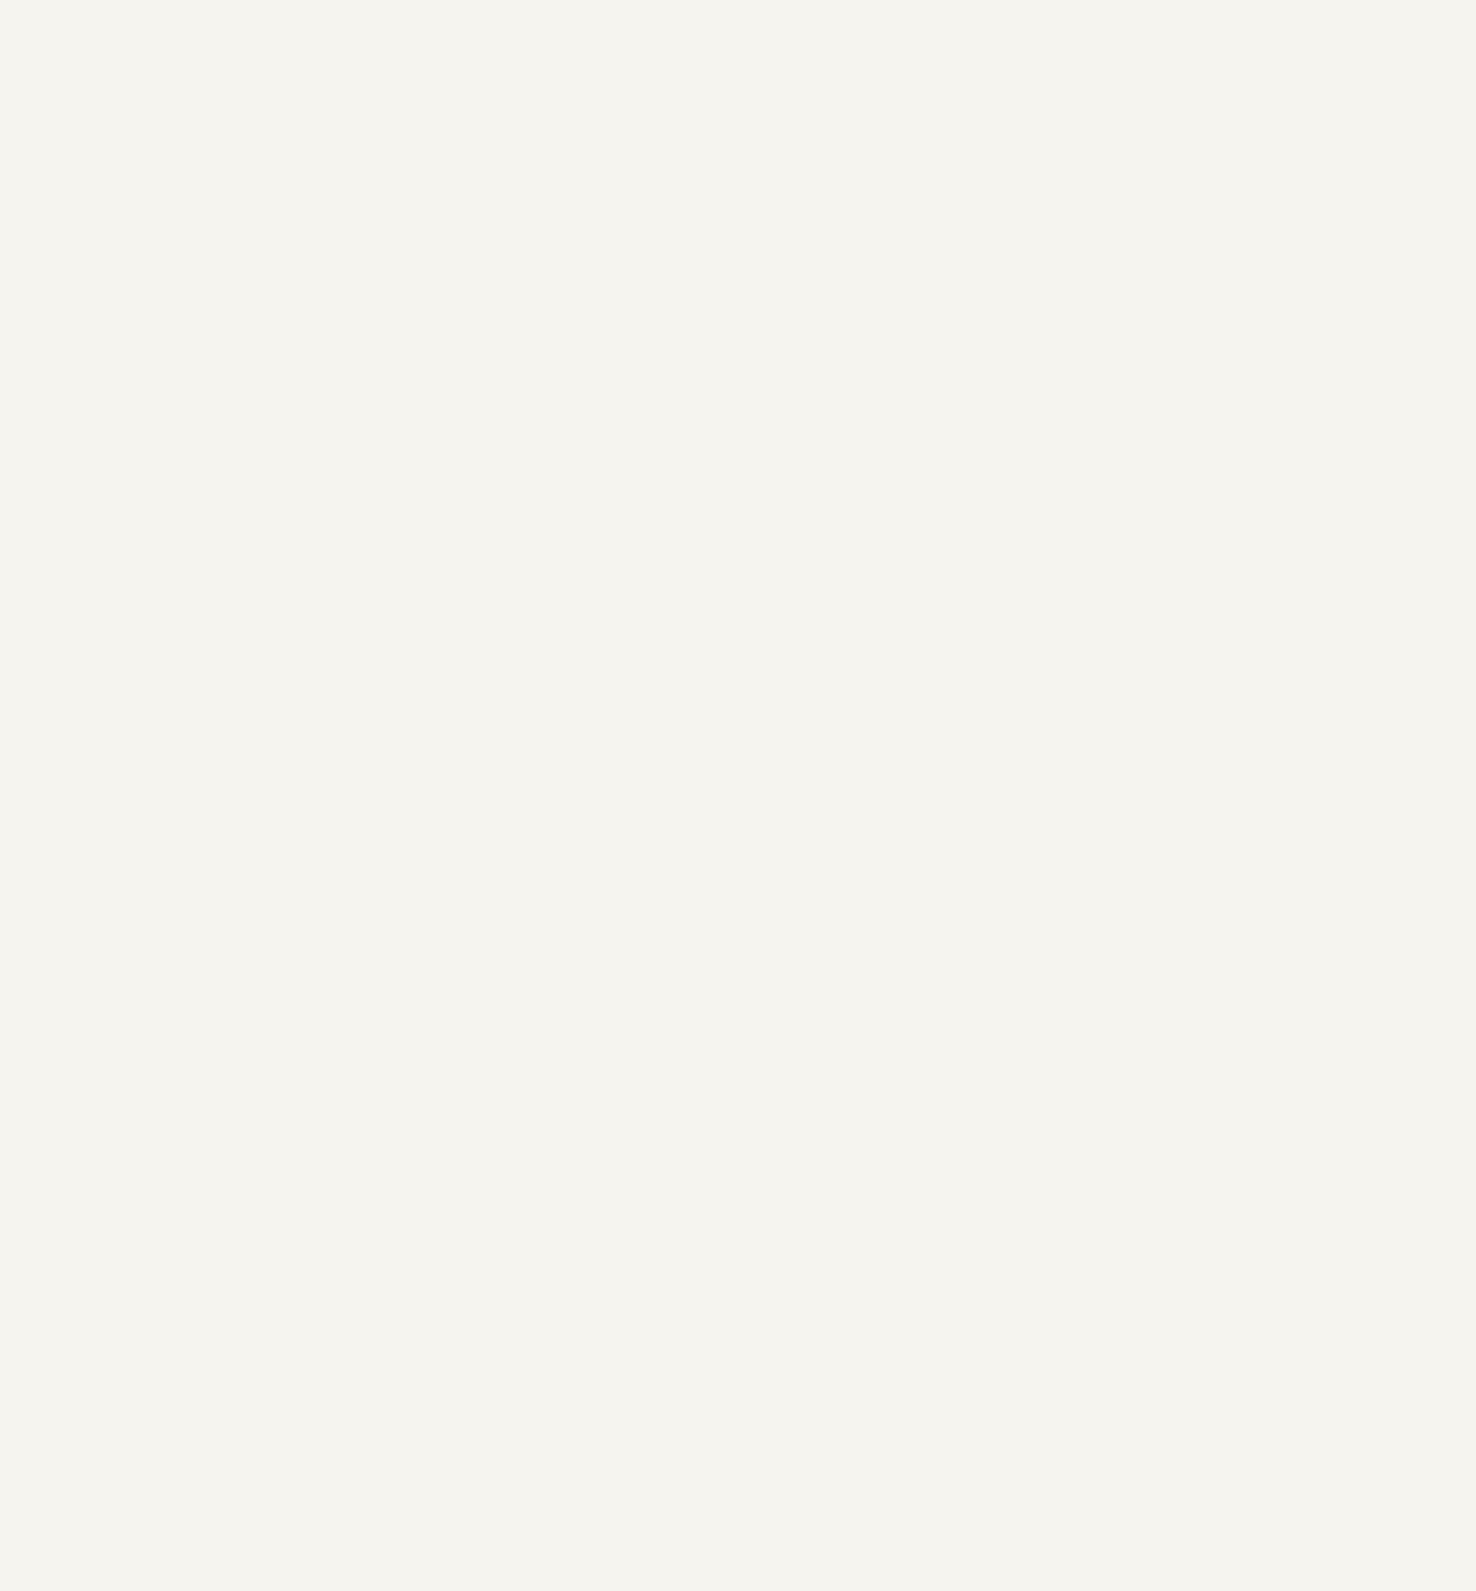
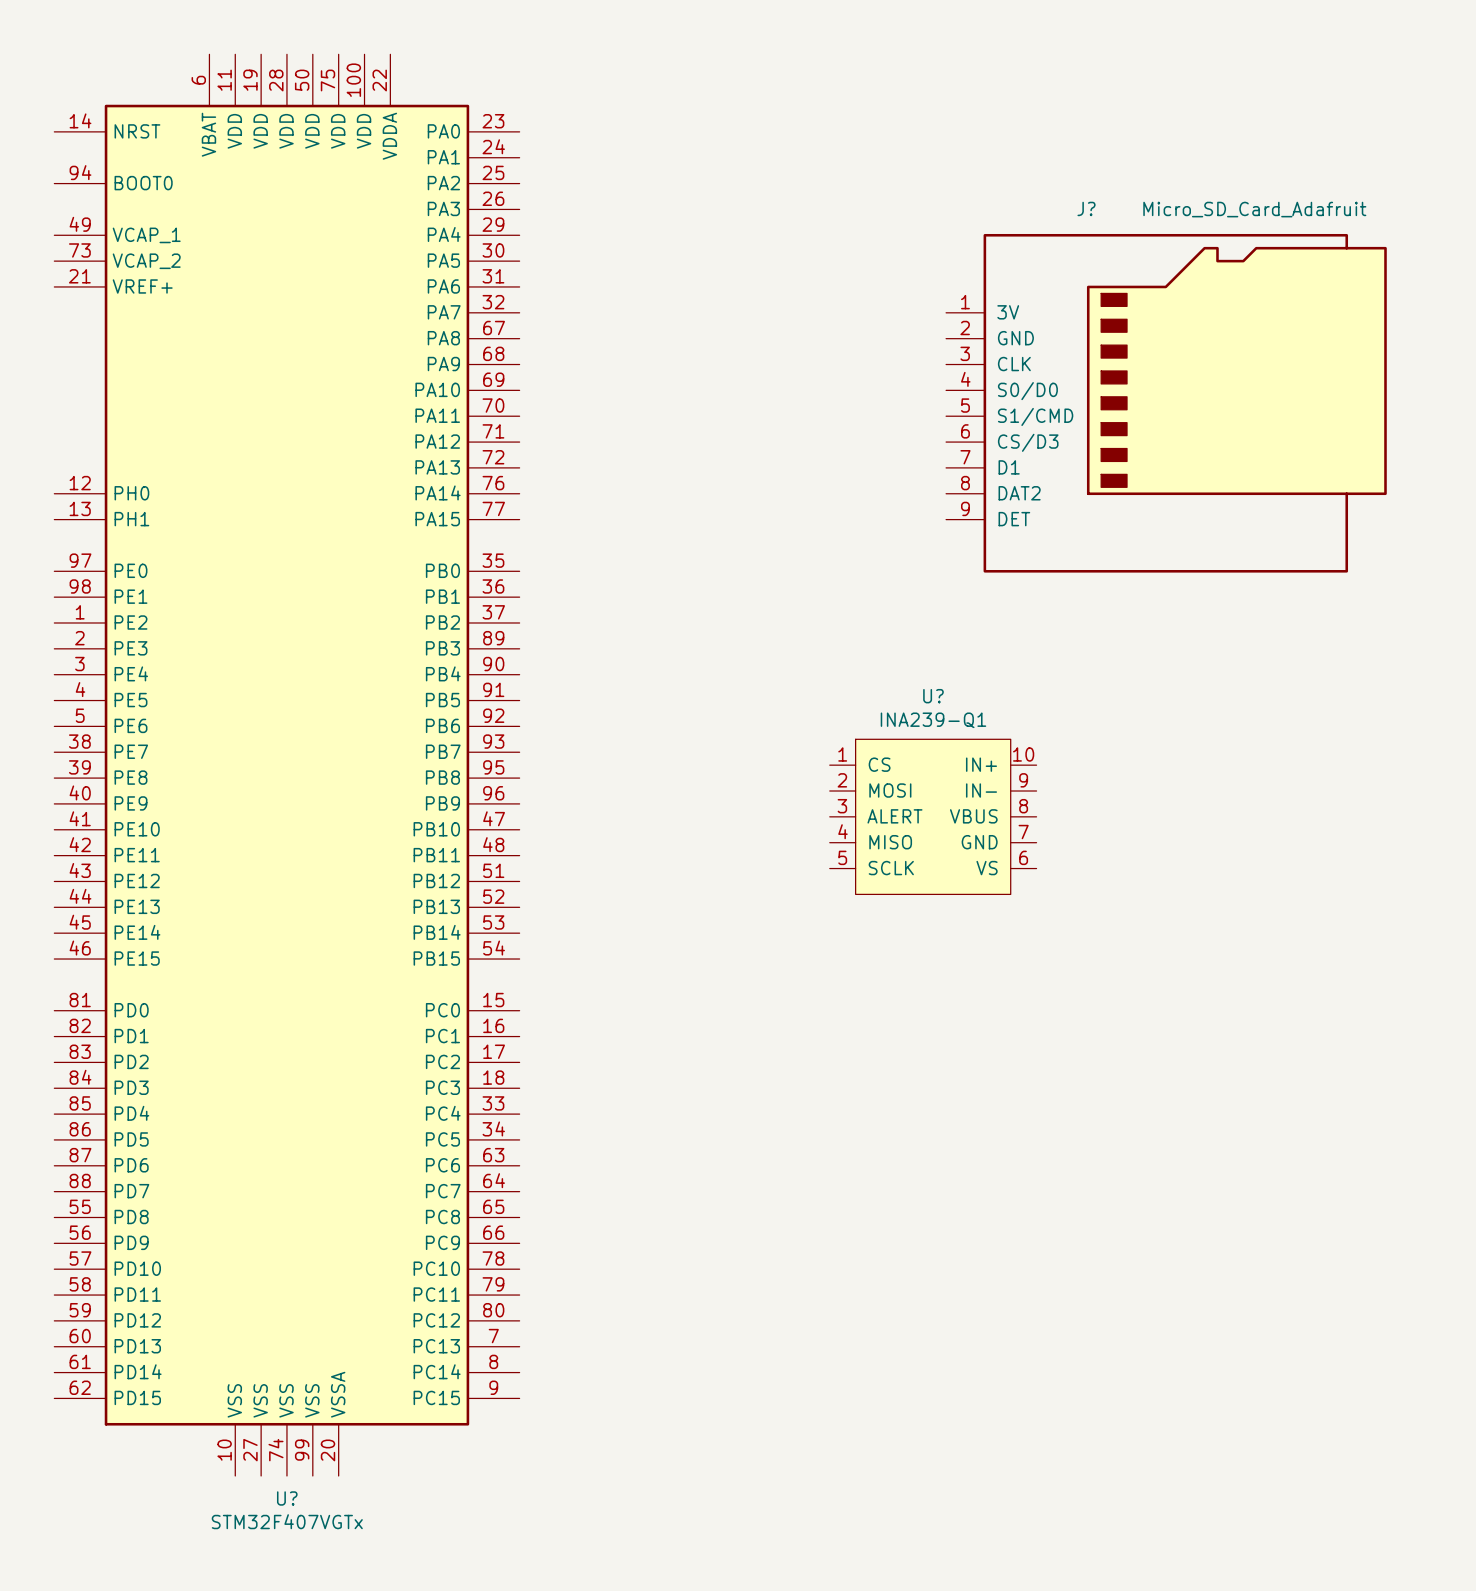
J?: none -> Micro_SD_Card_Adafruit (1166, 403)
U?: none -> STM32F407VGTx (286, 765)
U?: none -> INA239-Q1 (933, 816)

